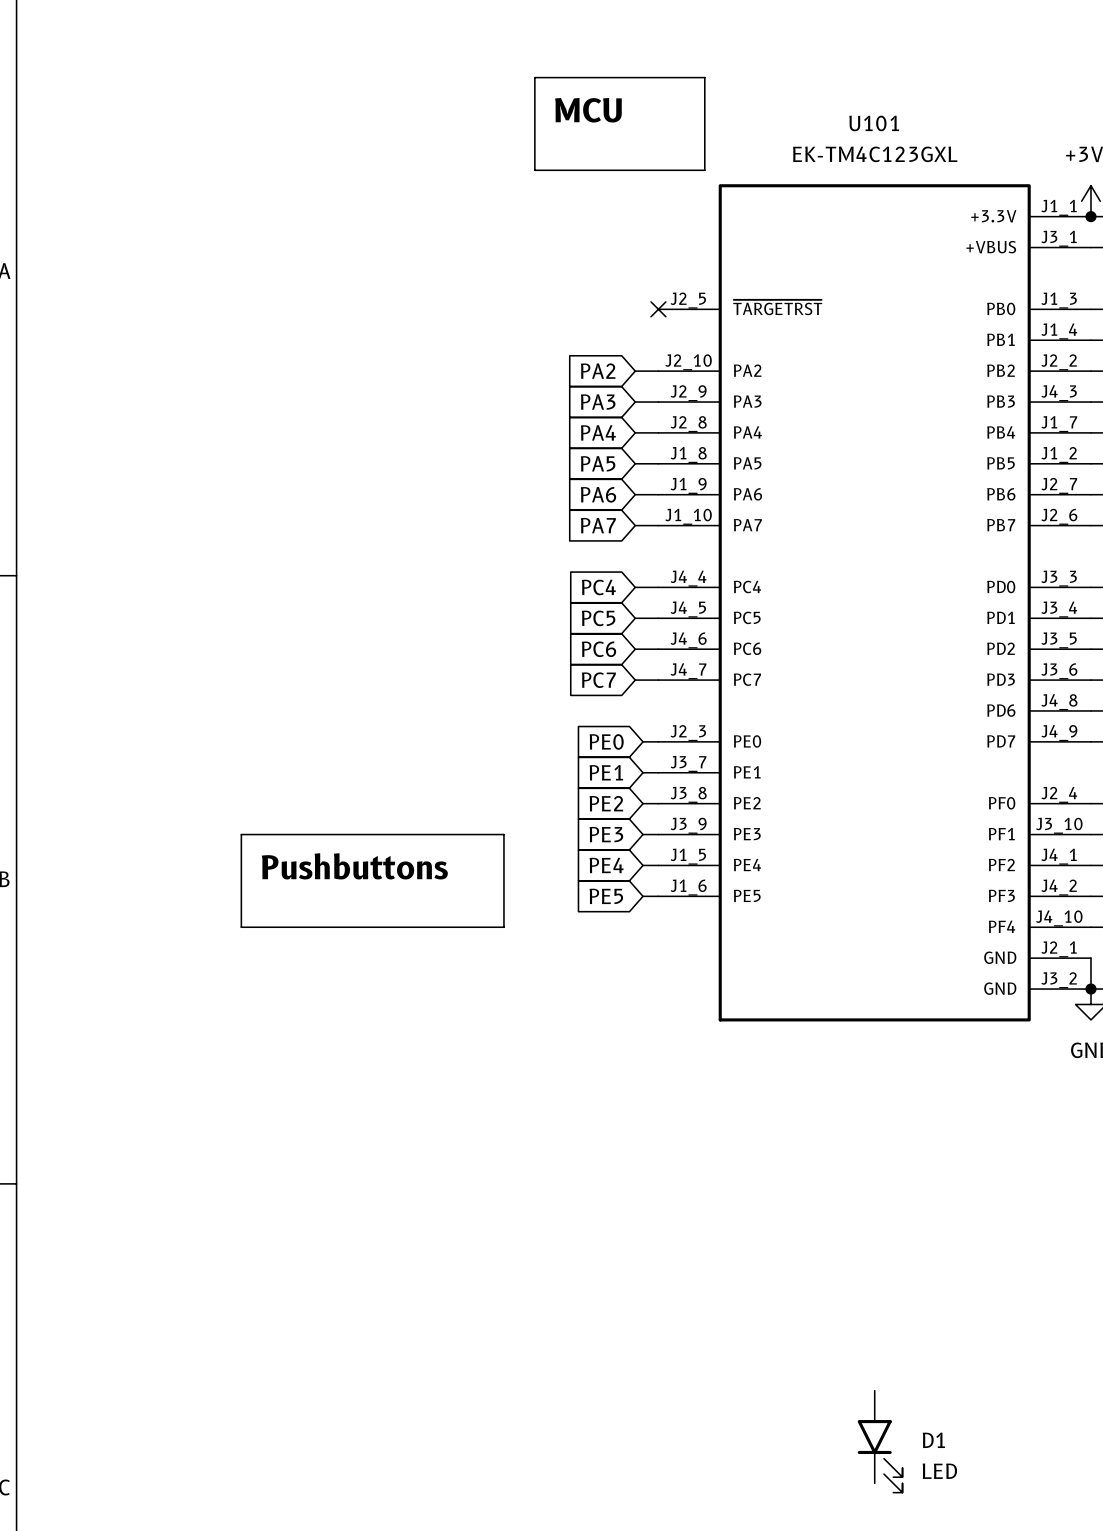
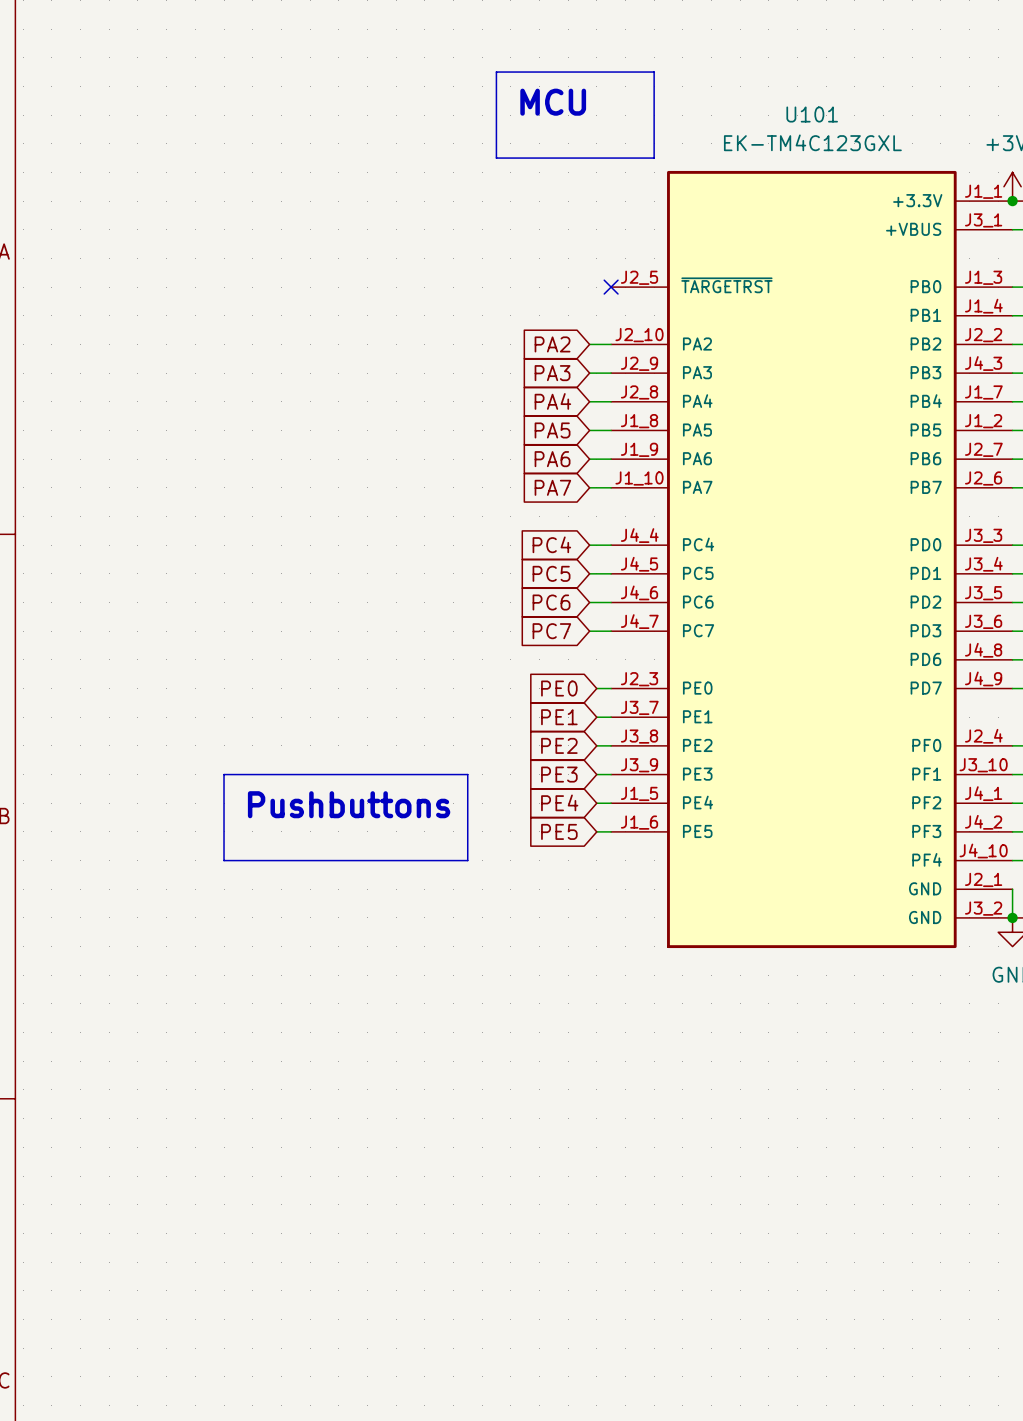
D1: LED (880, 1441) -> none

